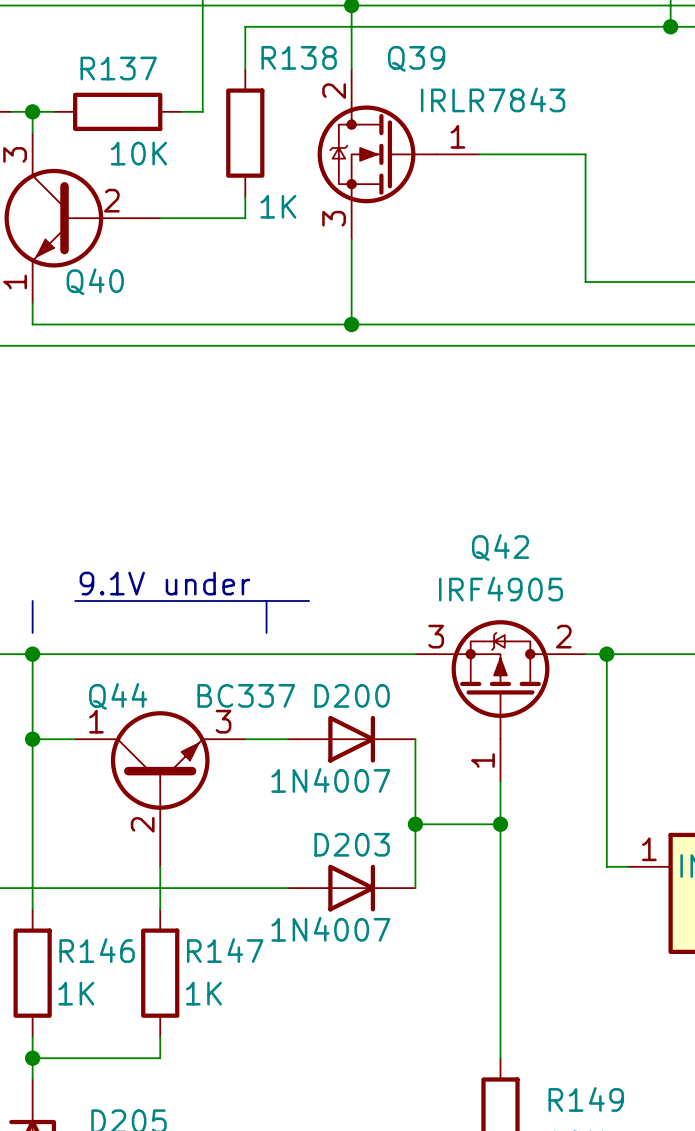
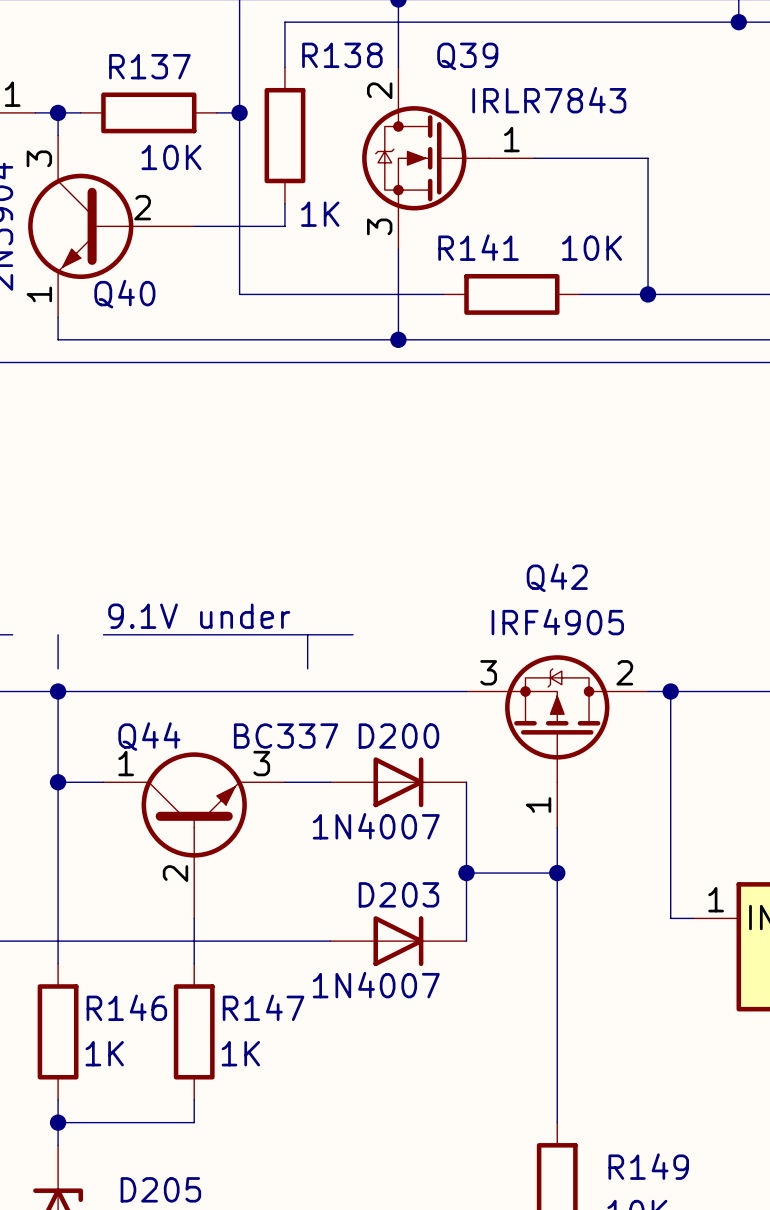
wire: none -> (239, 112) (239, 294) (443, 294)
junction: none -> (239, 112)
R141: none -> 10K (511, 294)
wire: none -> (579, 294) (648, 294)
junction: none -> (648, 294)

